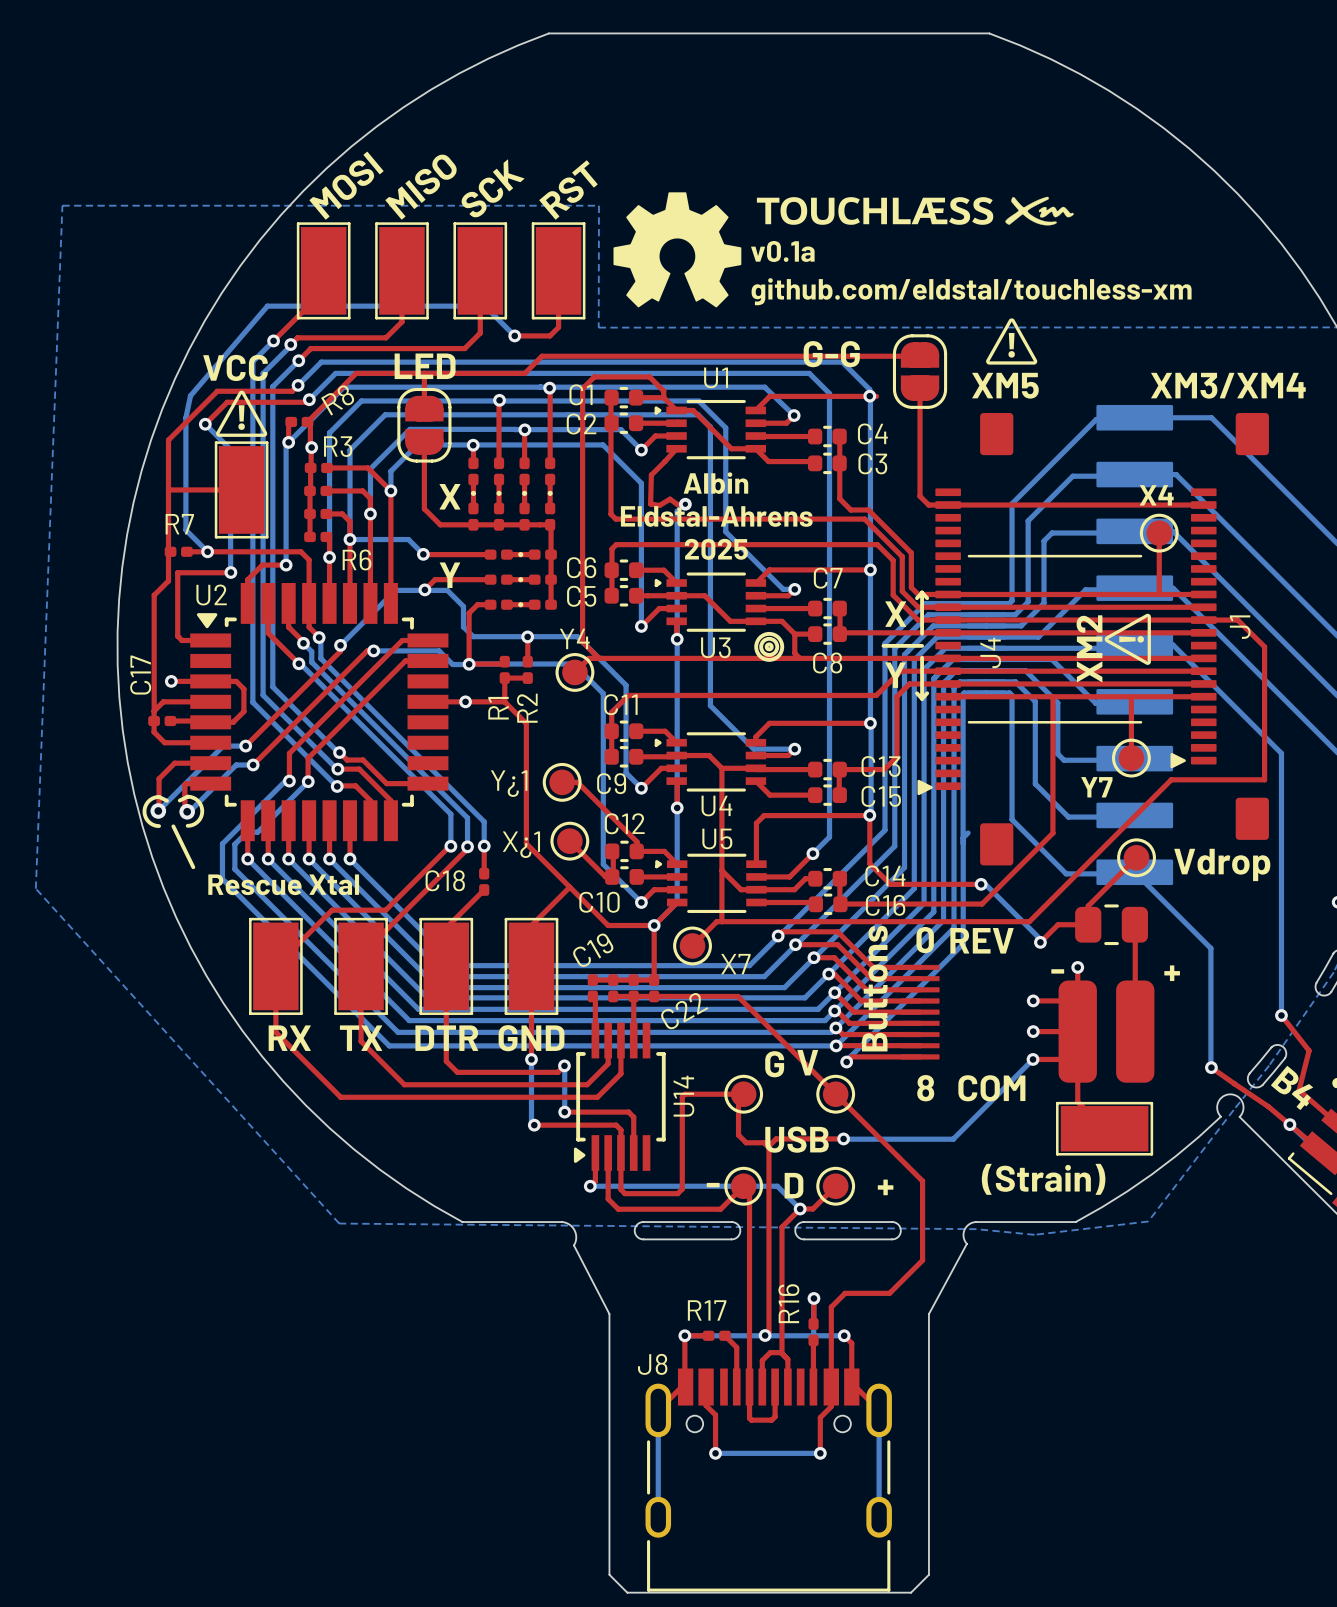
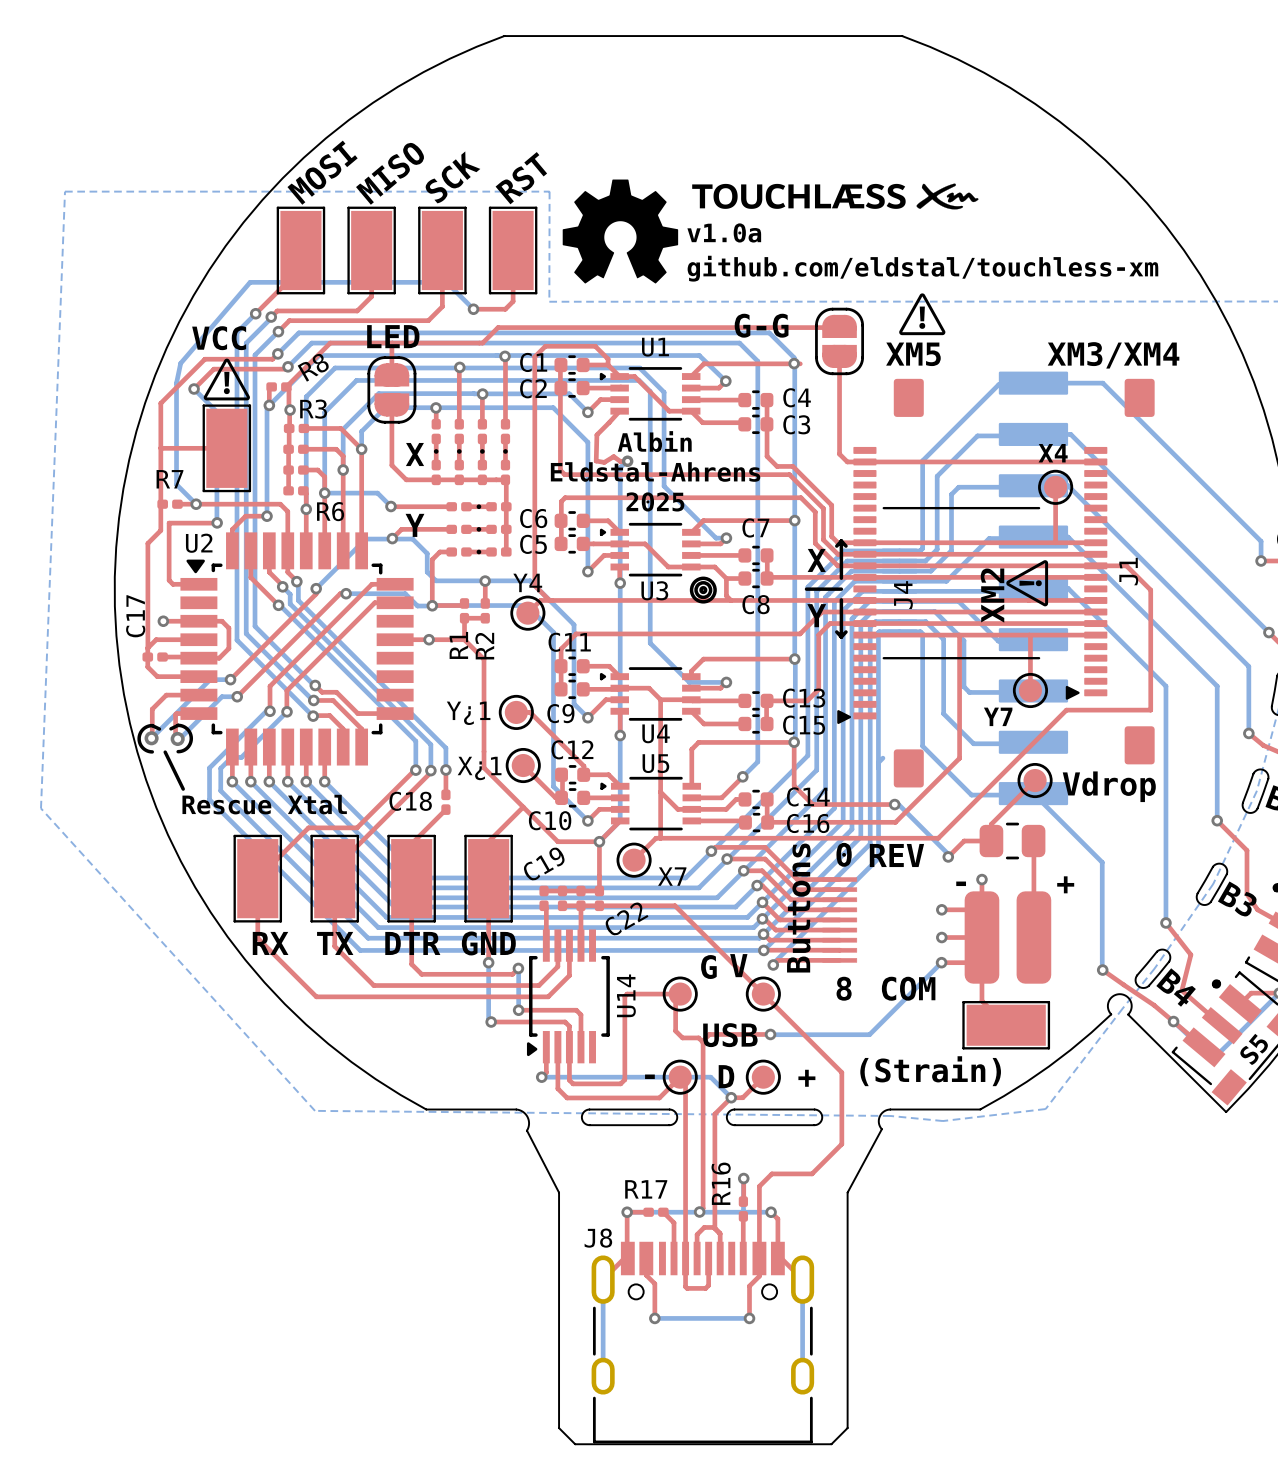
text: v0.1a (782, 251) -> v1.0a (724, 232)

